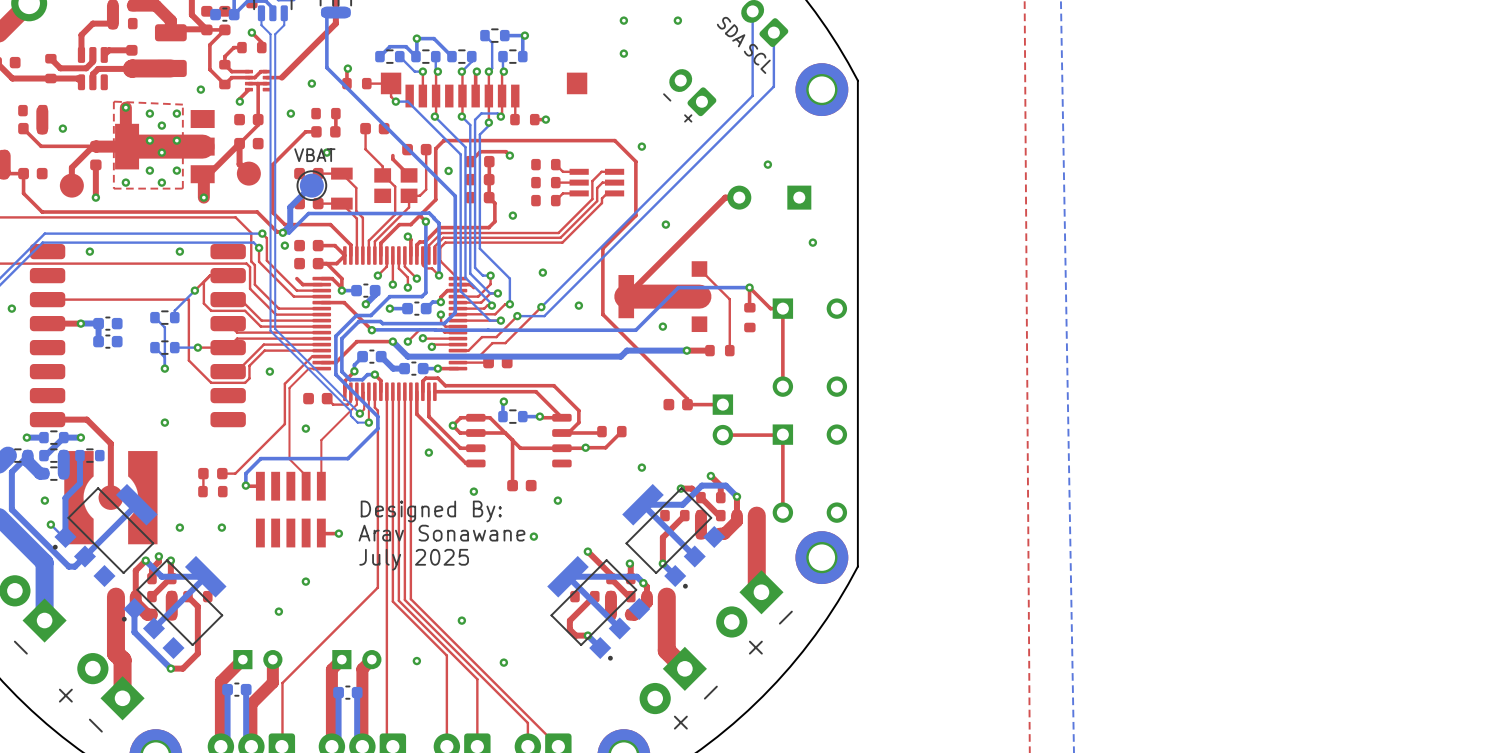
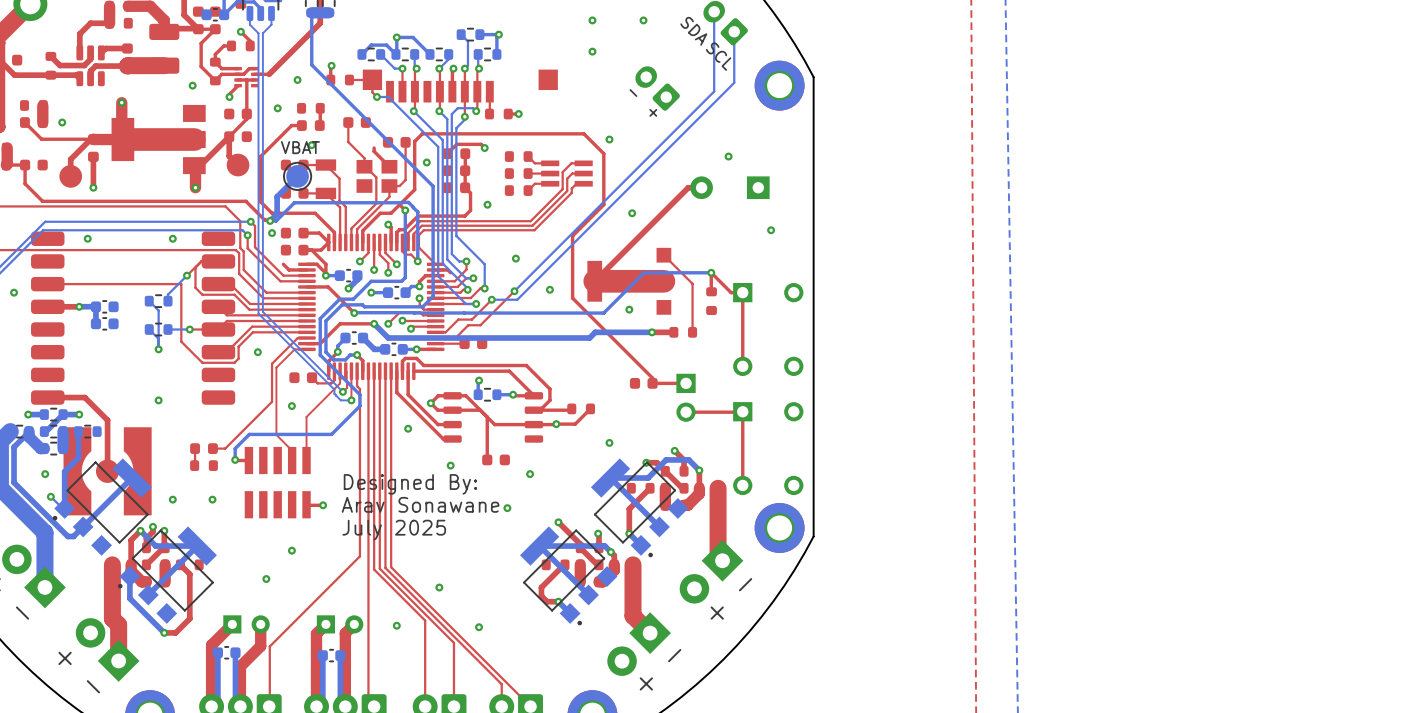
top zone outline: (113, 101) (182, 104) (182, 188) (113, 188) (113, 101) -> none
via: (149, 113) -> none
via: (176, 113) -> none
via: (161, 125) -> none
via: (149, 140) -> none
via: (176, 140) -> none
via: (161, 152) -> none
via: (149, 170) -> none
via: (176, 170) -> none
via: (125, 182) -> none
via: (161, 182) -> none

